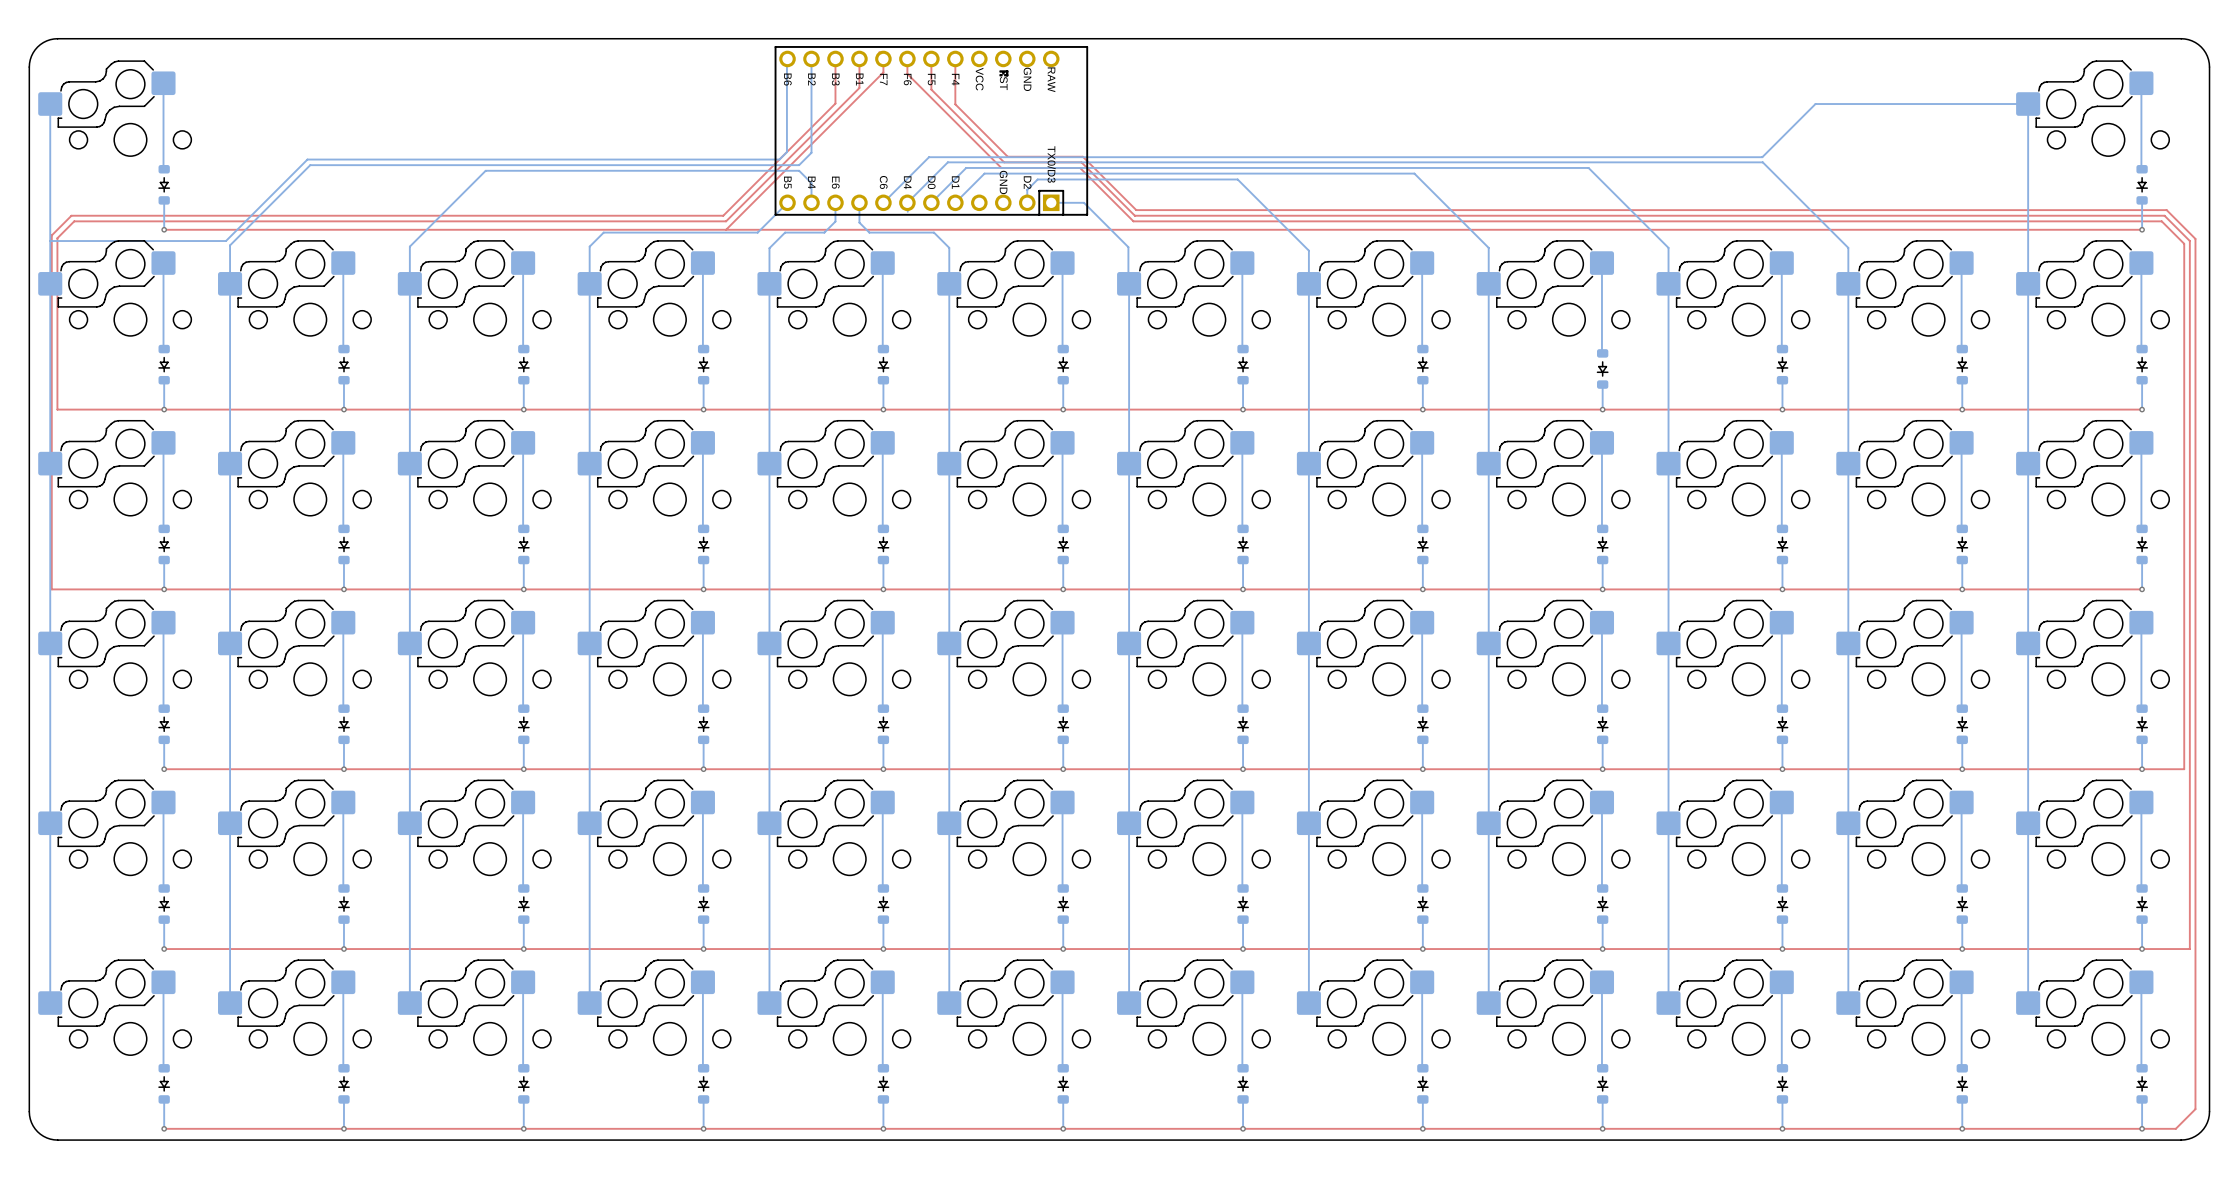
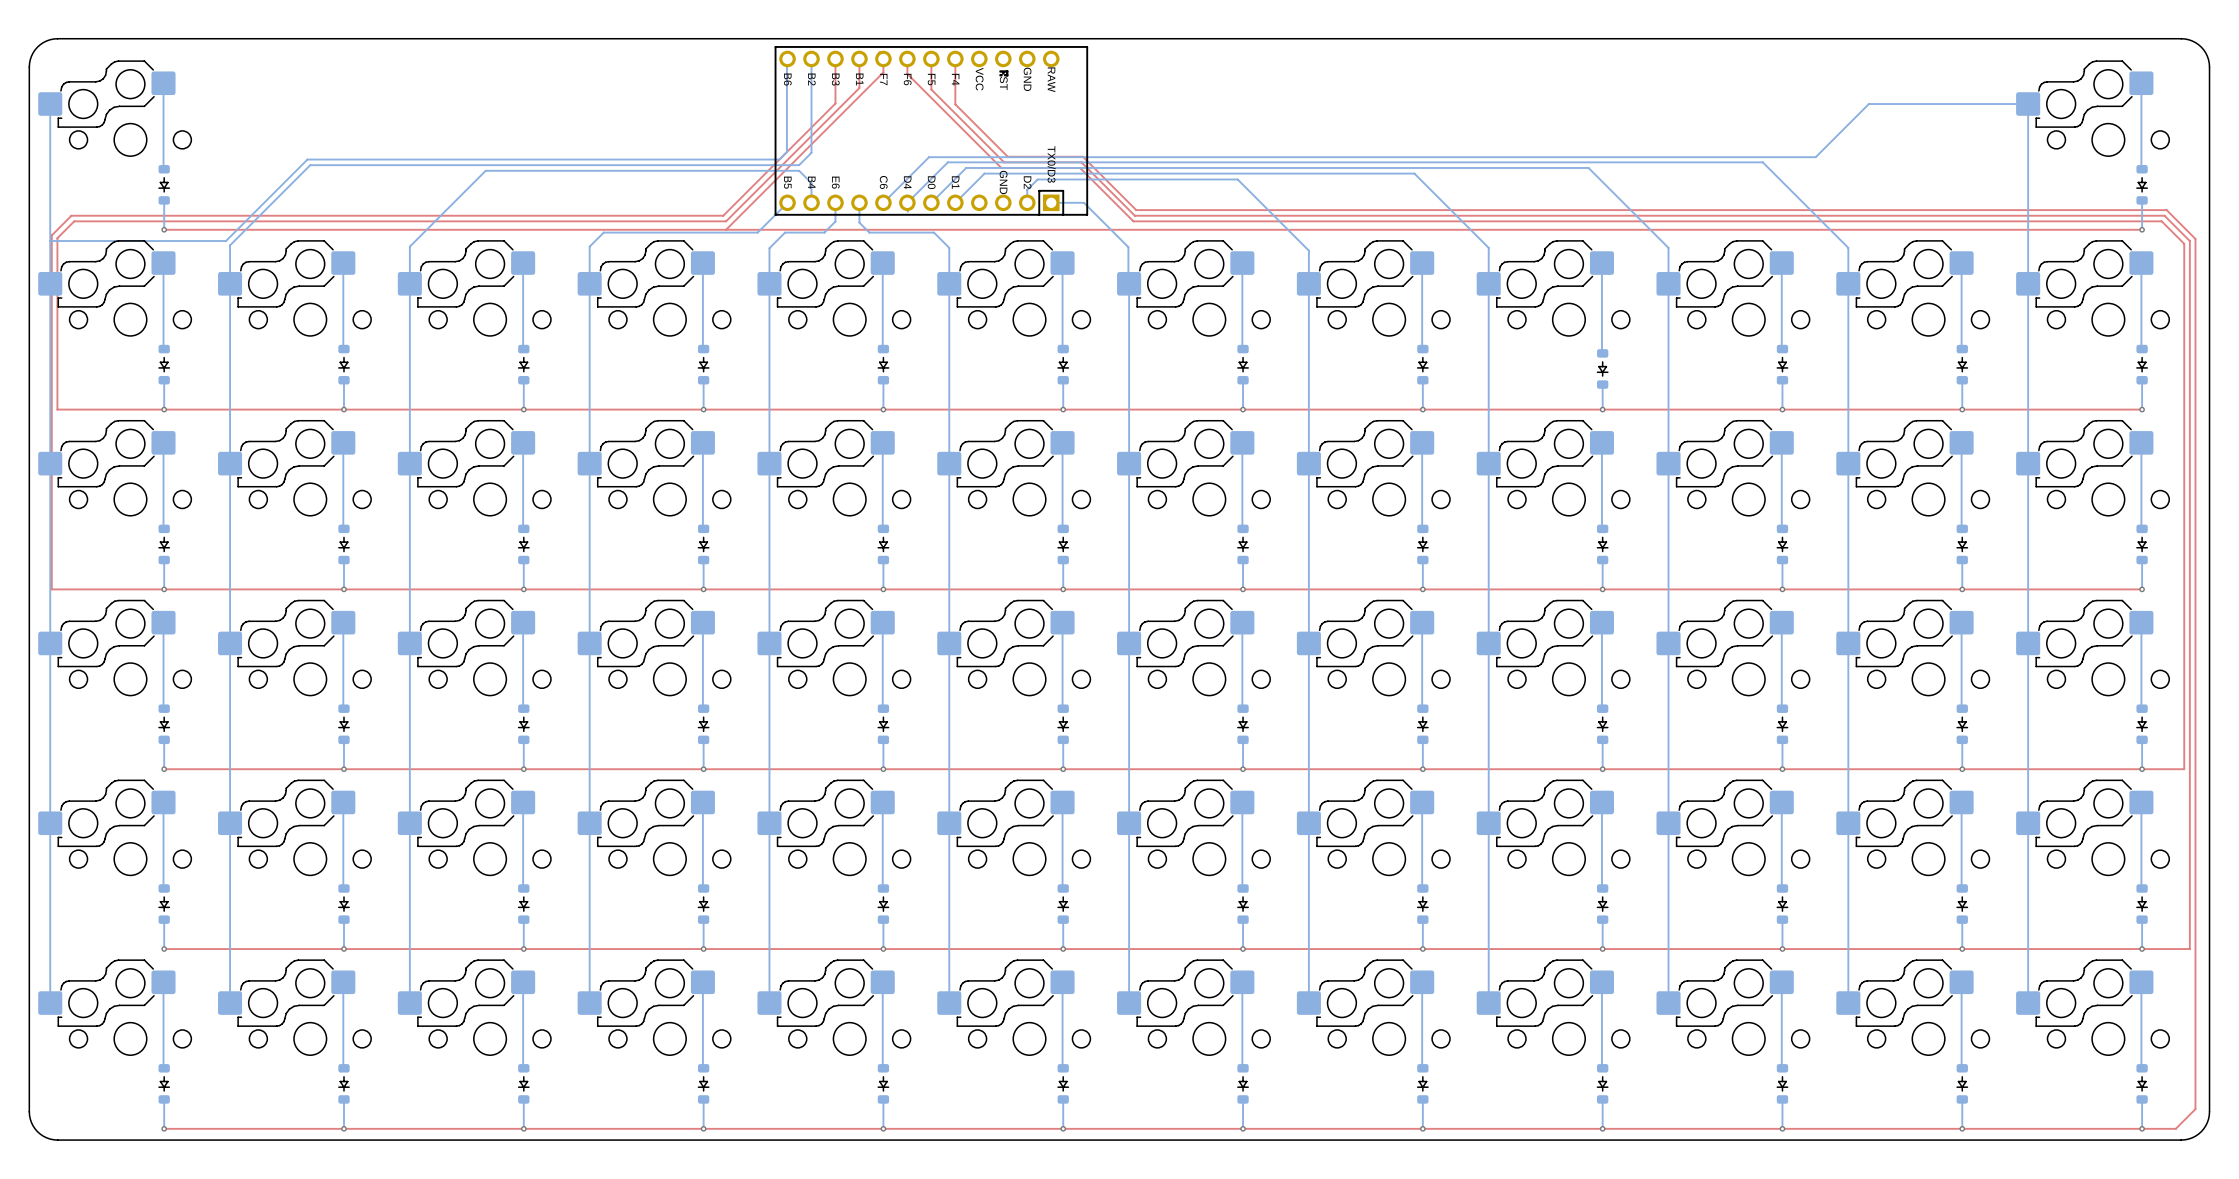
bottom track: (1868, 104) (1815, 104) (1762, 157) -> (1868, 104) (1815, 157) (1762, 157)

